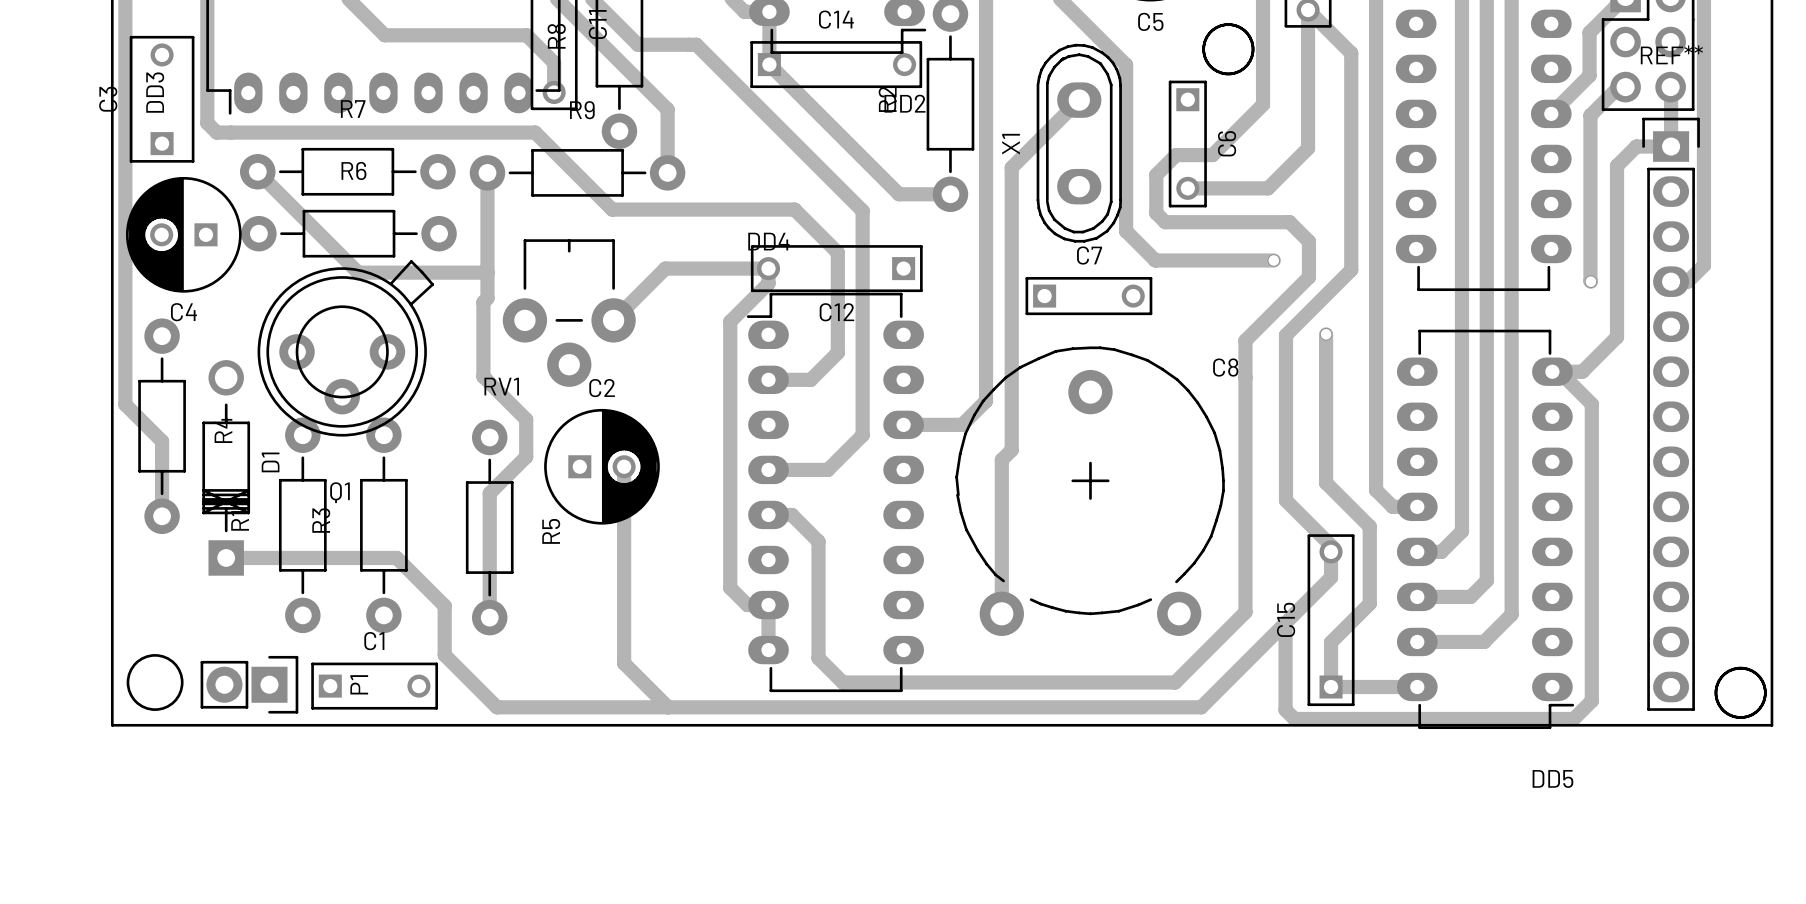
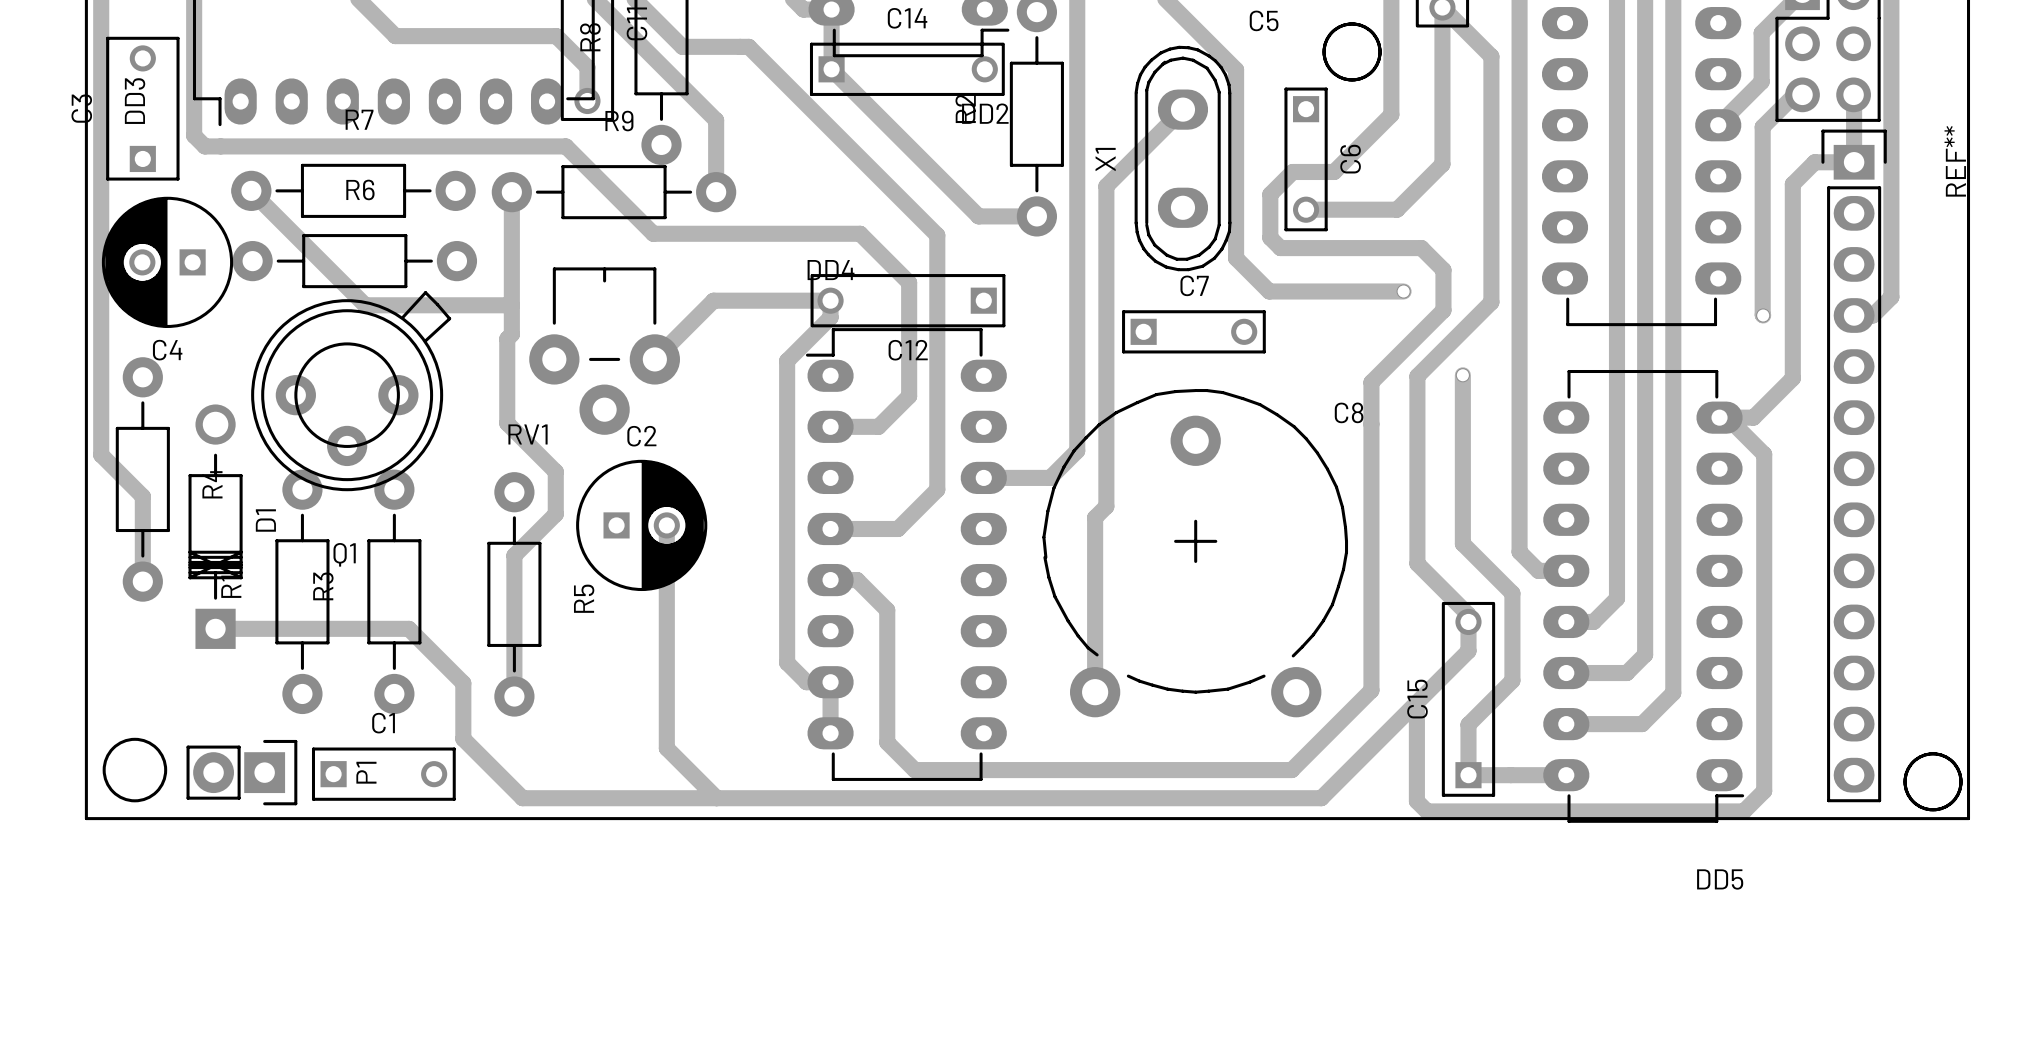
REF** name rotation: 0° (1671, 54) -> 90° counterclockwise (1955, 161)
REF** name position: REF** (1671, 54) -> REF** (1955, 161)

